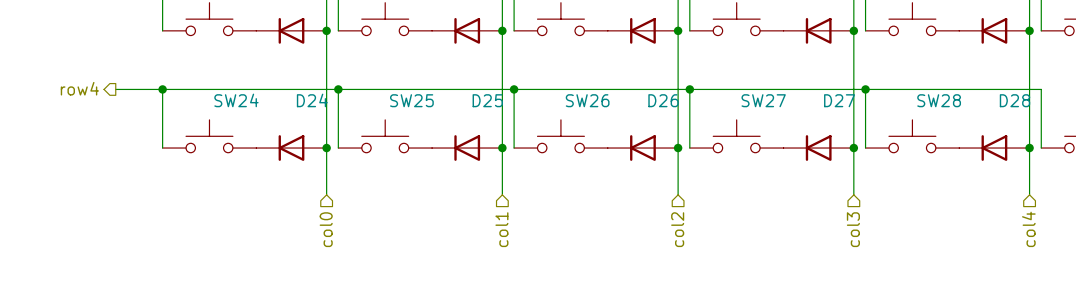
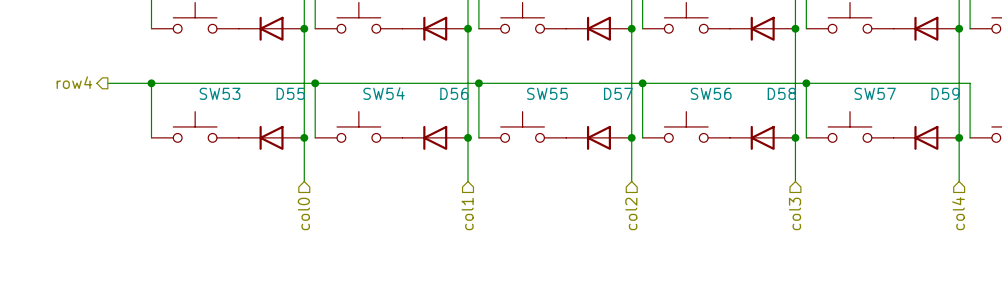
SW24 name: SW24 (236, 100) -> SW53 (220, 93)
D24 name: D24 (312, 100) -> D55 (290, 93)
SW25 name: SW25 (411, 100) -> SW54 (384, 93)
D25 name: D25 (487, 100) -> D56 (454, 93)
SW26 name: SW26 (587, 100) -> SW55 (547, 93)
D26 name: D26 (663, 100) -> D57 (618, 93)
SW27 name: SW27 (763, 100) -> SW56 (711, 93)
D27 name: D27 (839, 100) -> D58 (781, 93)
SW28 name: SW28 (939, 100) -> SW57 (875, 93)
D28 name: D28 (1014, 100) -> D59 (945, 93)

